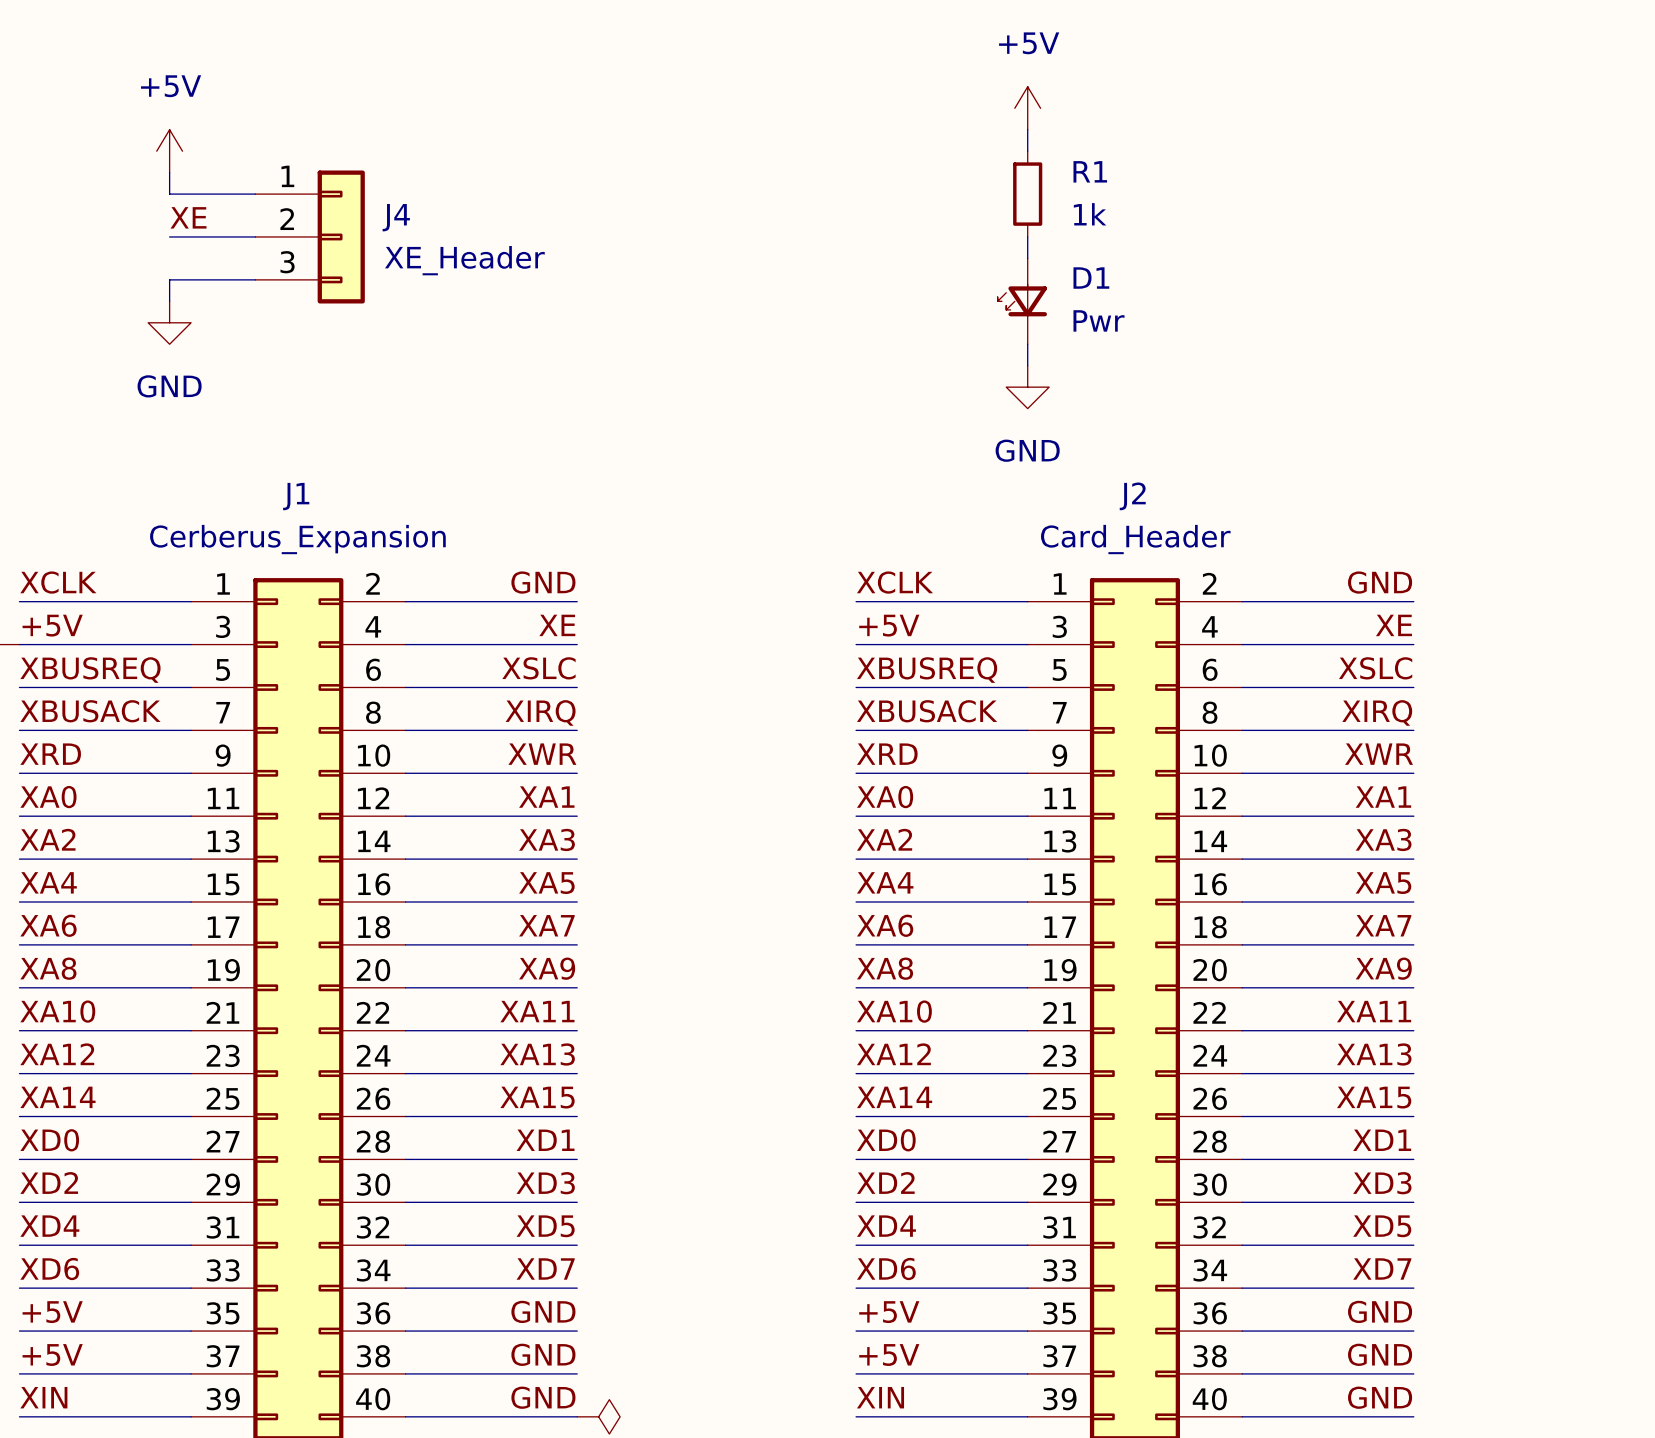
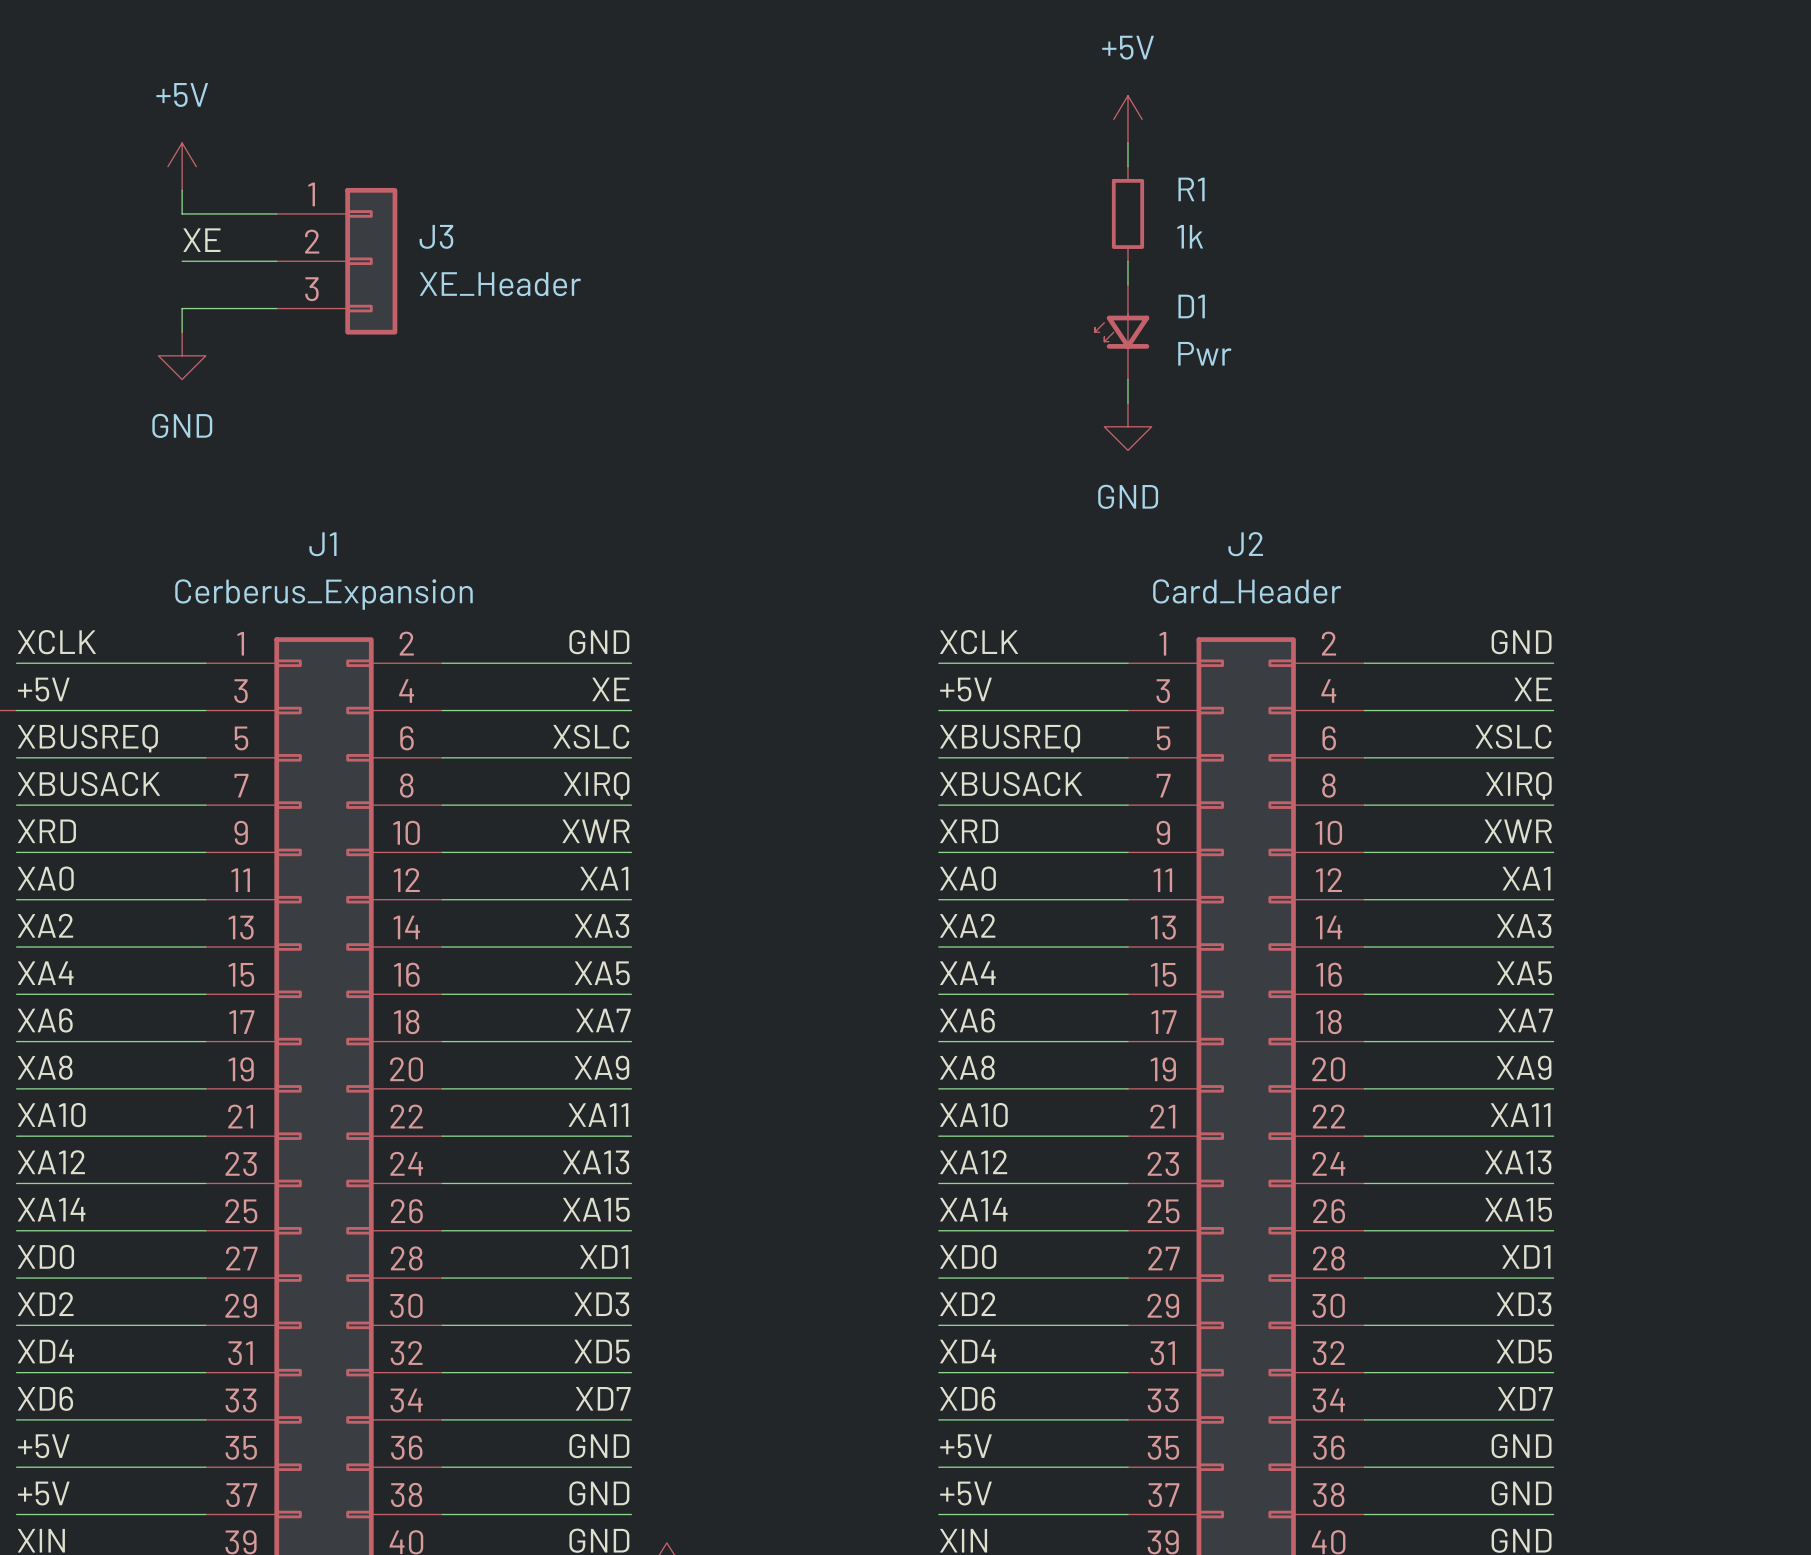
J4 name: J4 (396, 217) -> J3 (436, 236)

